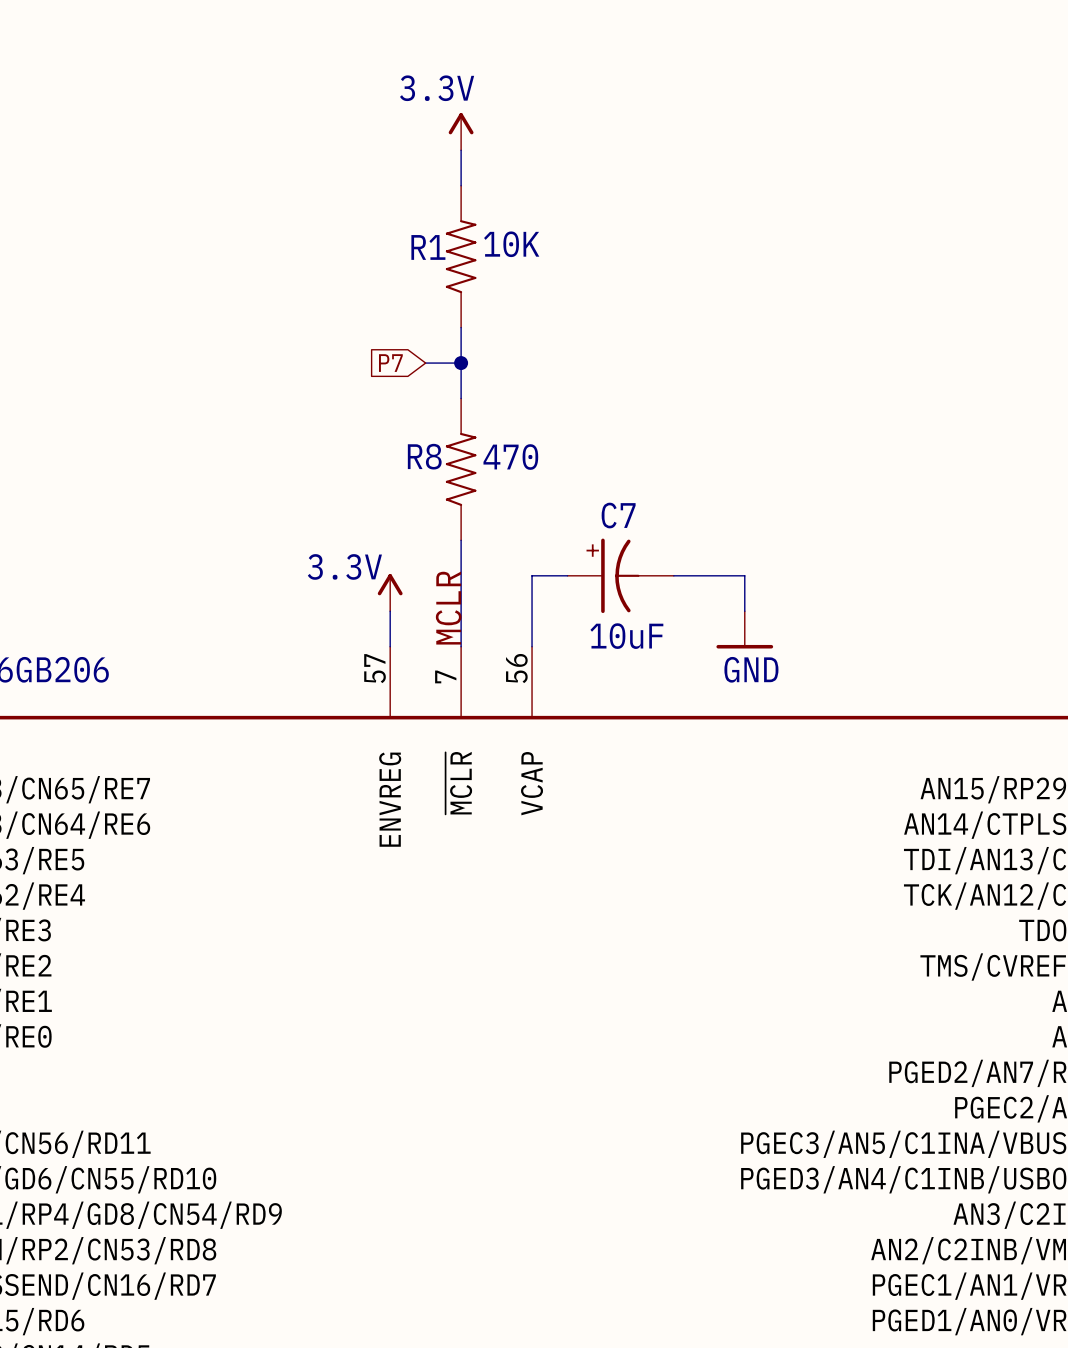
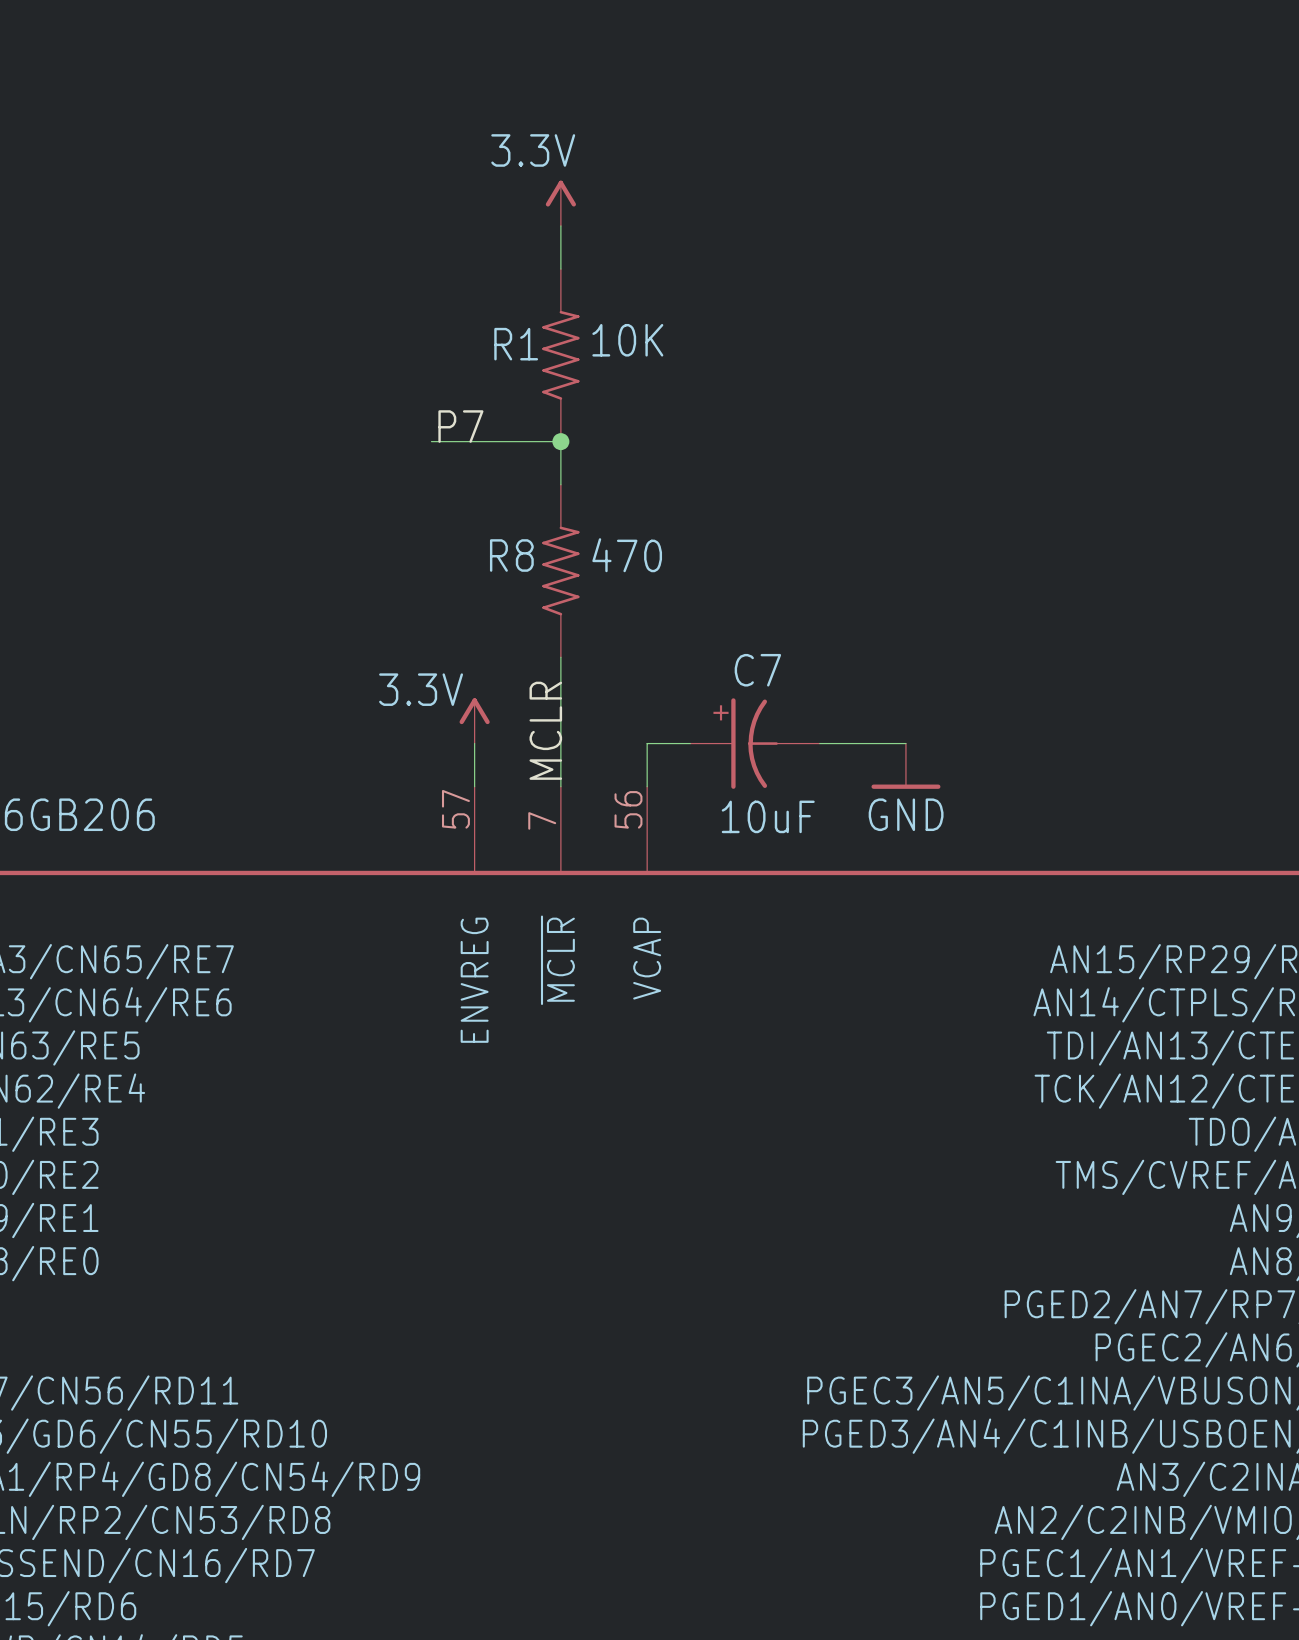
power symbol position: 3.3V (461, 131) -> 3.3V (560, 203)
R1 position: (461, 256) -> (560, 355)
label: none -> P7 (460, 426)
wire: none -> (431, 441) (517, 441)
global label: P7 (390, 363) -> none
wire: (567, 575) (532, 575) (532, 611) -> (690, 743) (647, 743)
C7 position: (620, 575) -> (754, 743)
wire: (673, 575) (744, 575) (744, 611) -> (819, 743) (905, 743)

